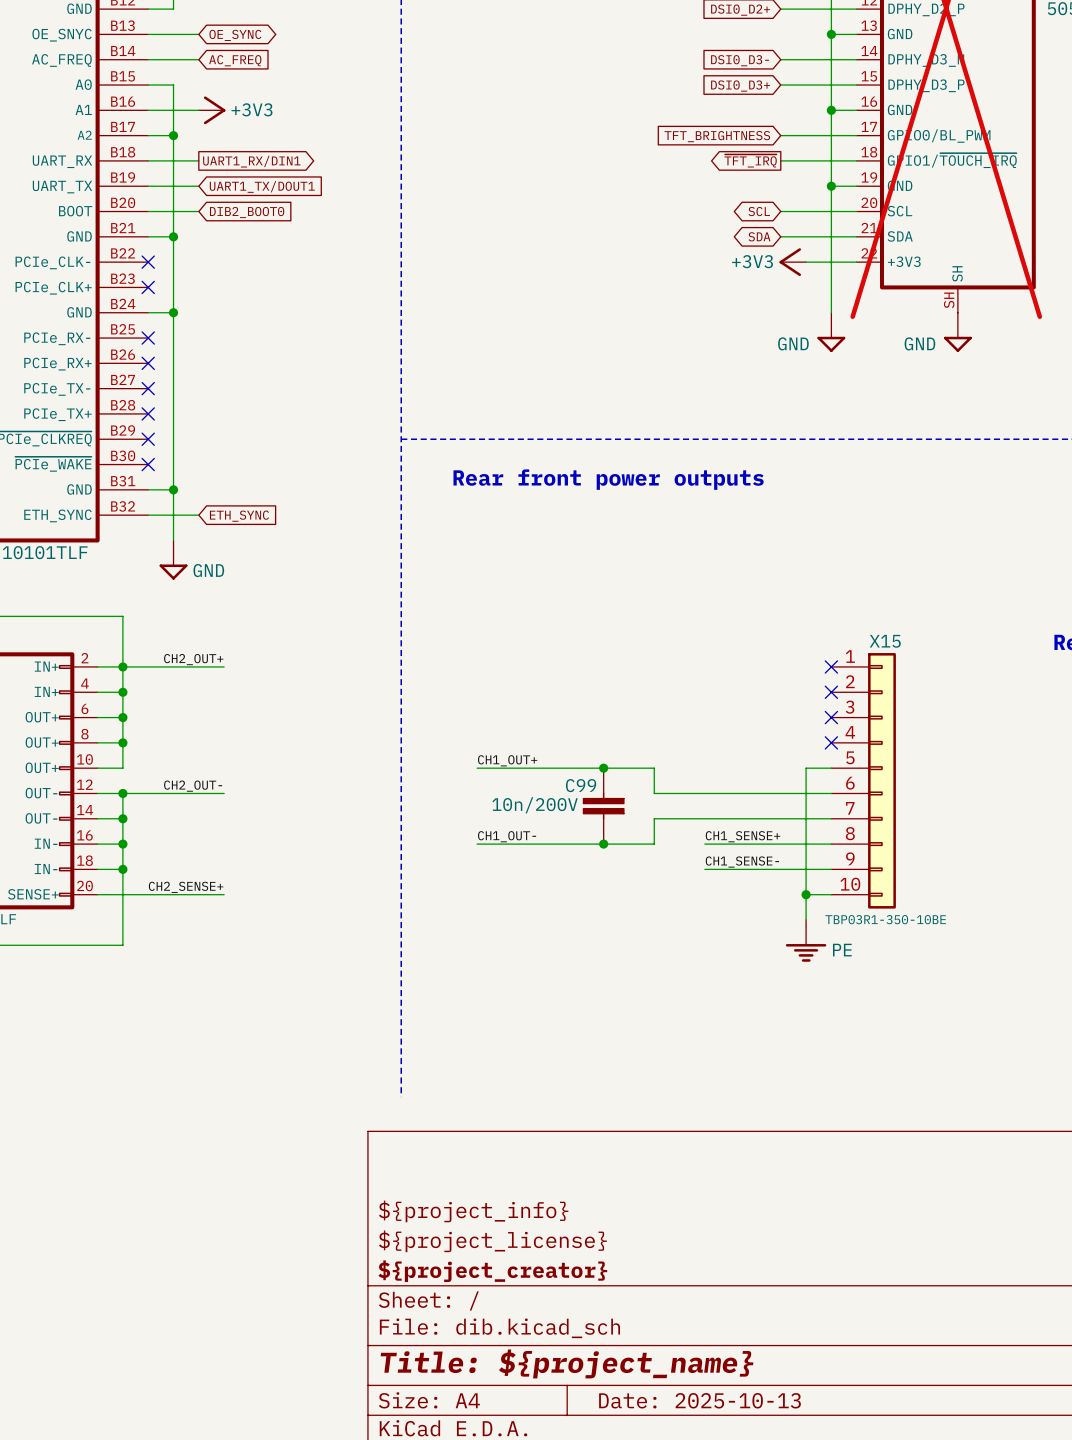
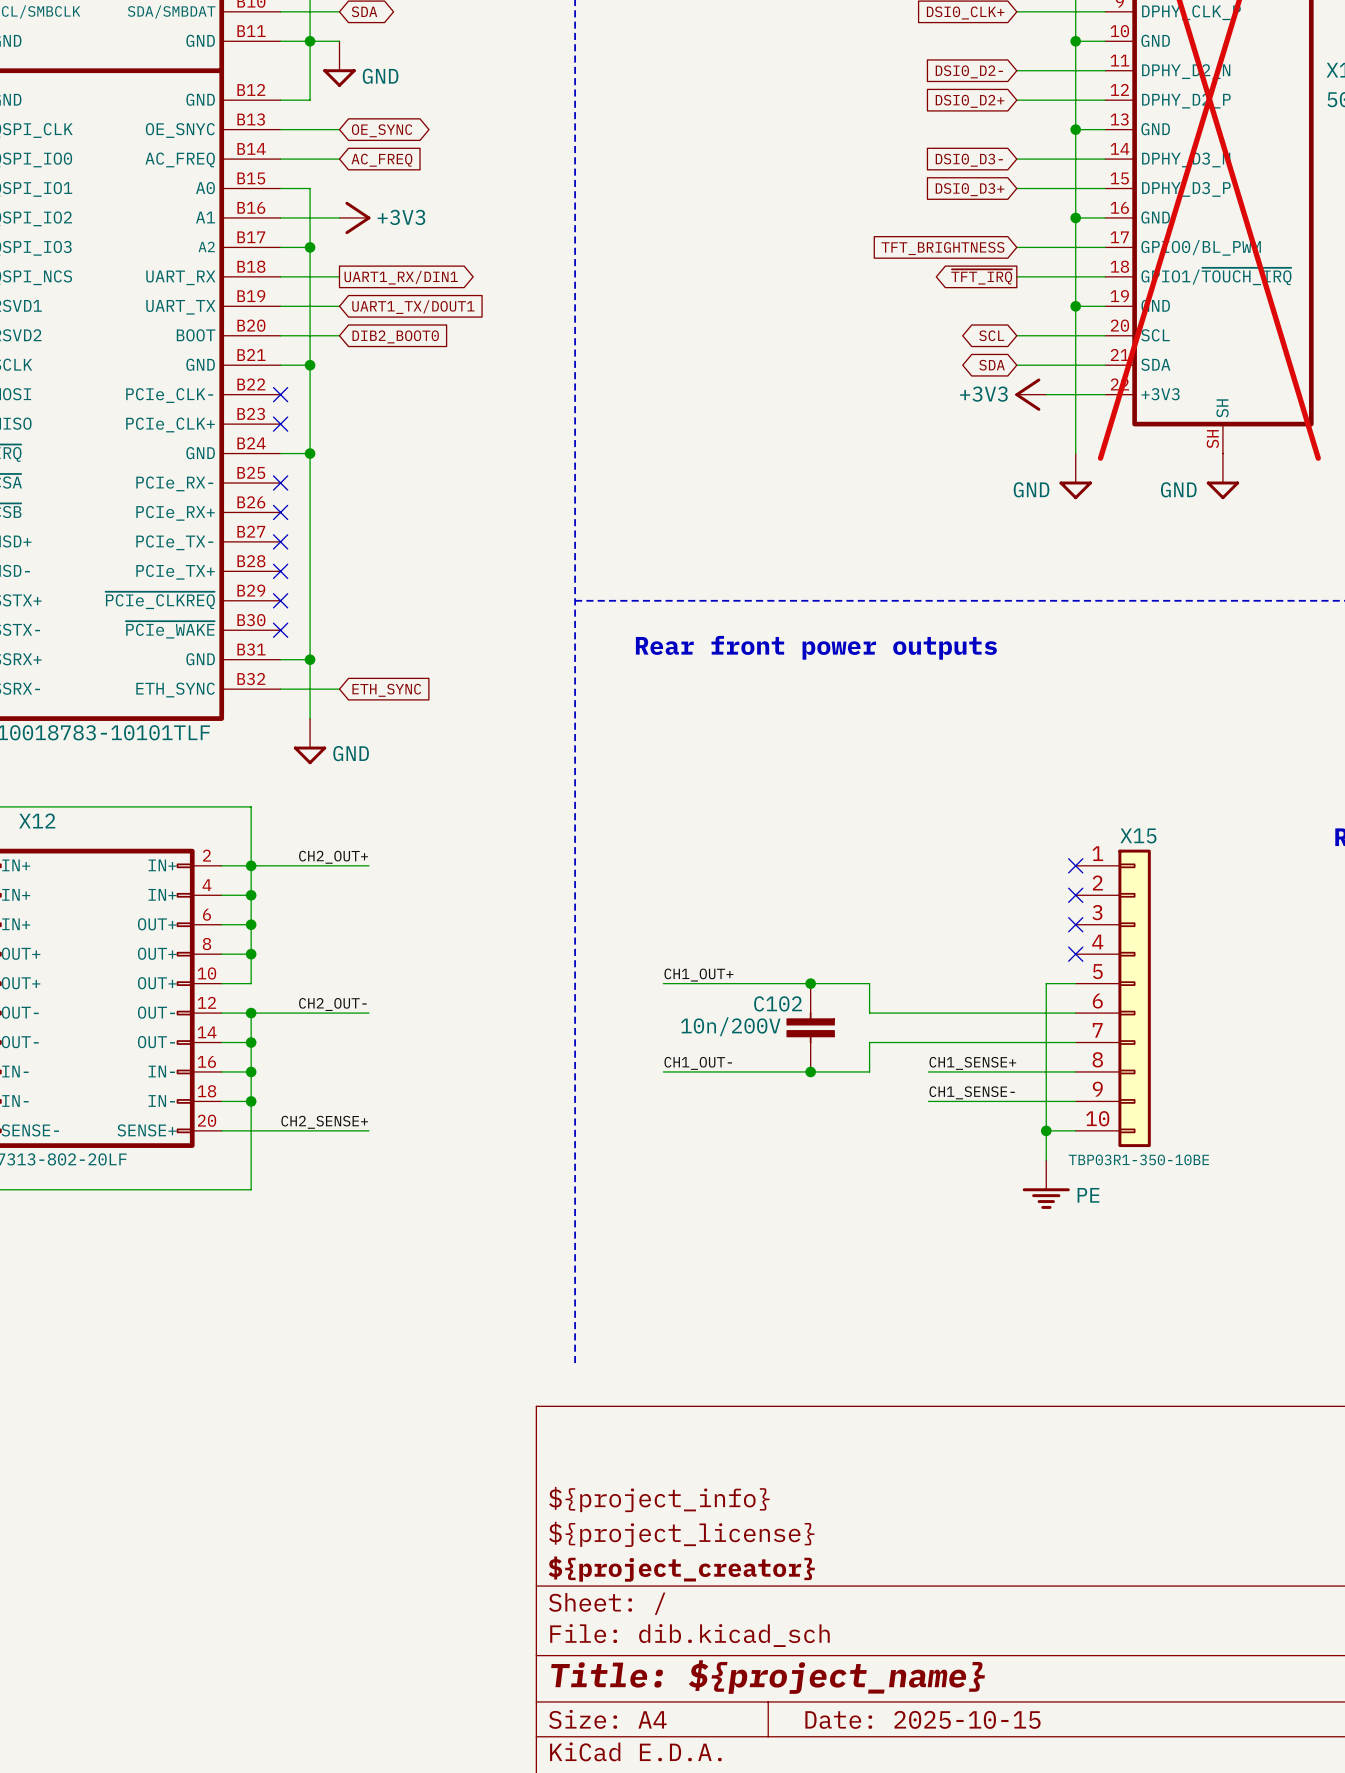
C99 name: C99 (581, 785) -> C102 (778, 1003)
title block: Date: 2025-10-13 (699, 1400) -> Date: 2025-10-15 (922, 1719)

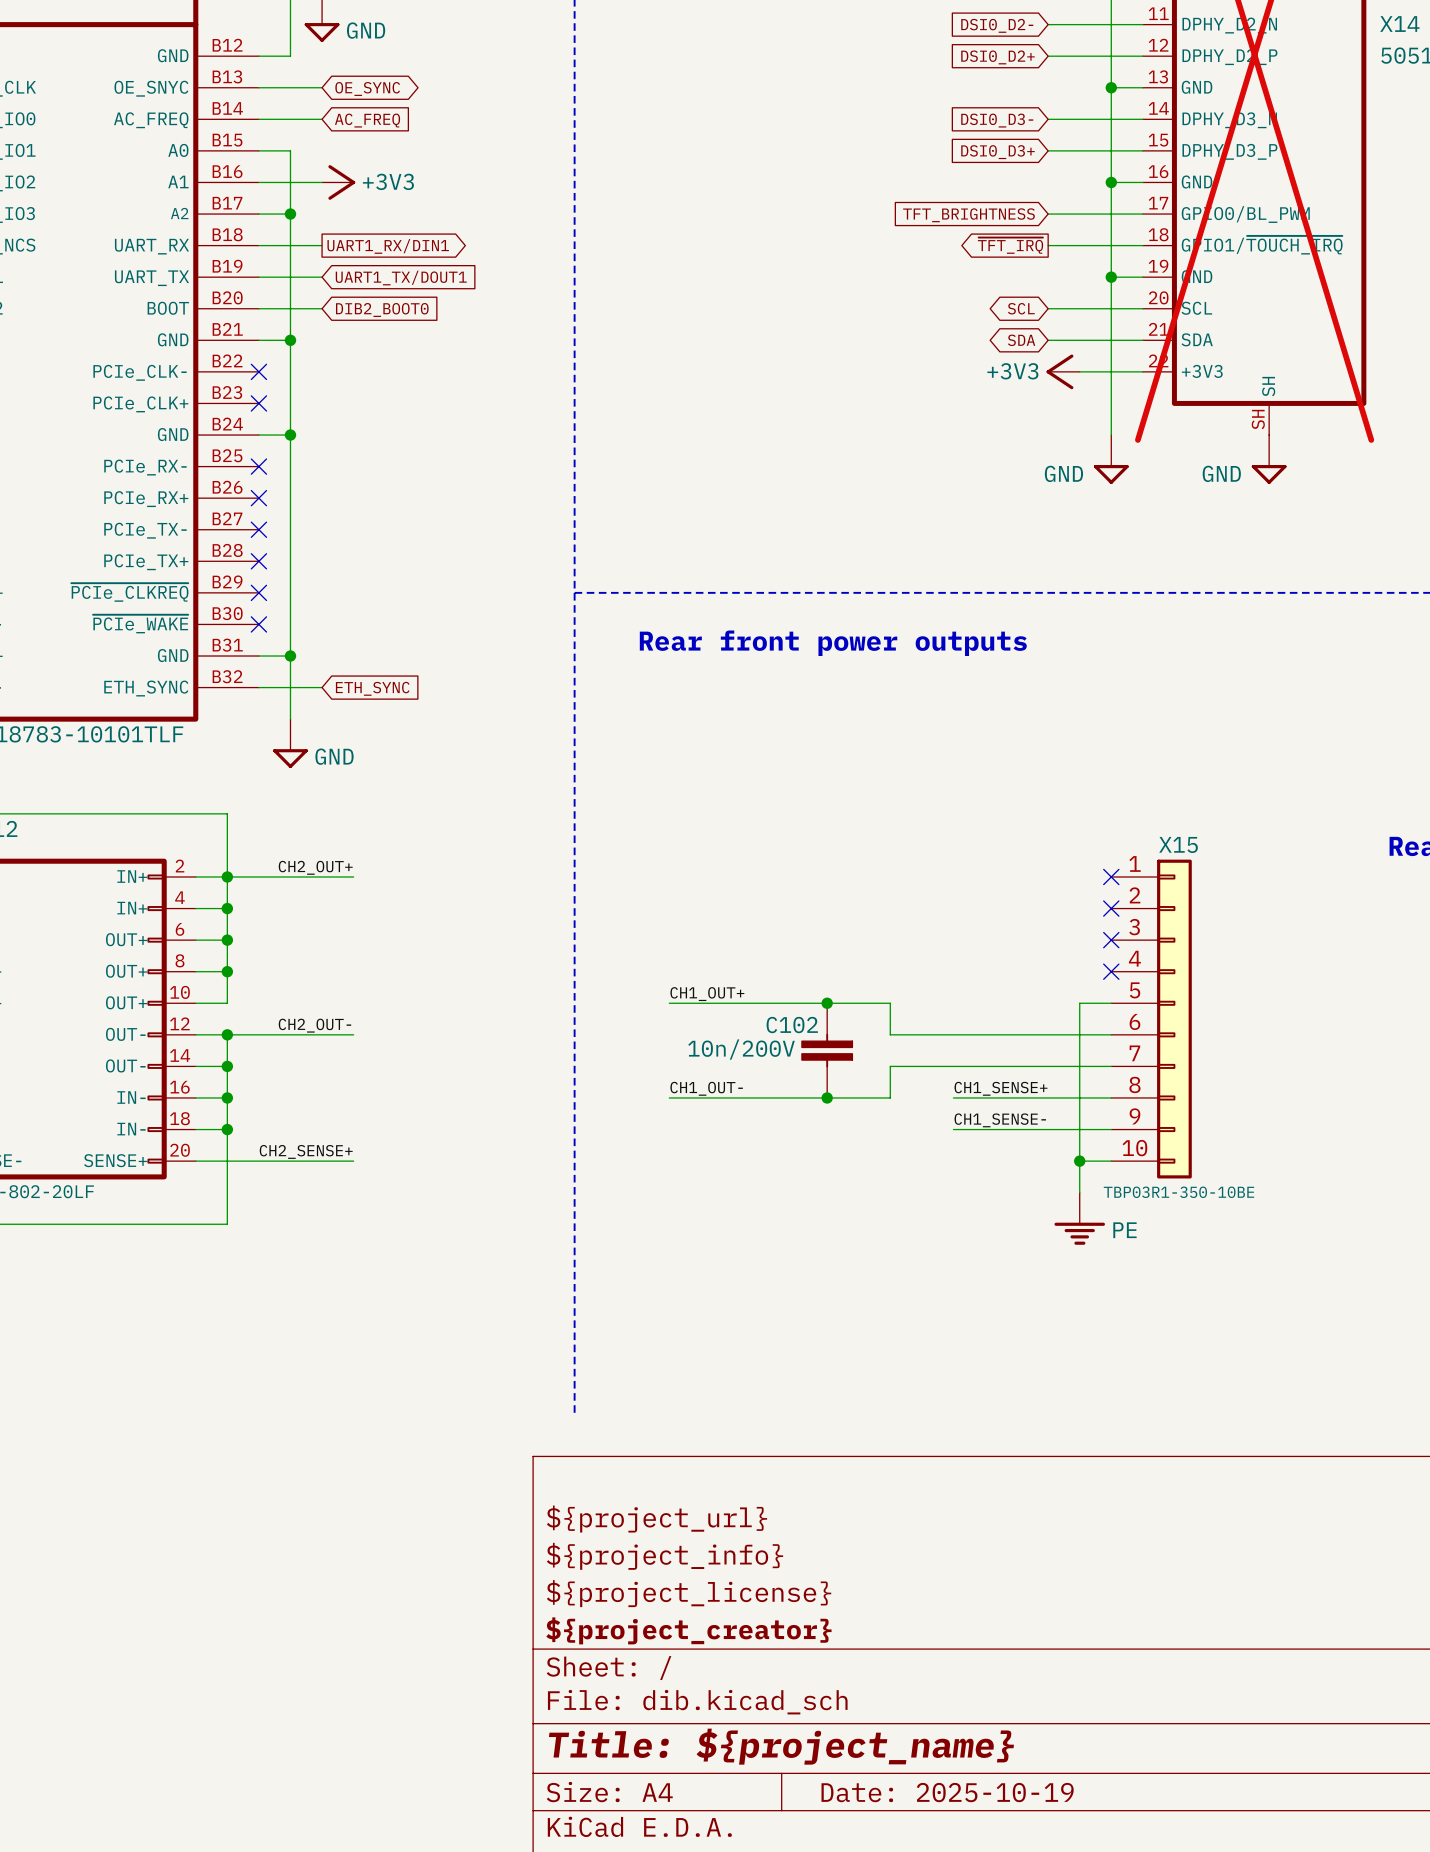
title block: none -> ${project_url} (656, 1519)
title block: Date: 2025-10-15 (922, 1719) -> Date: 2025-10-19 (947, 1792)

